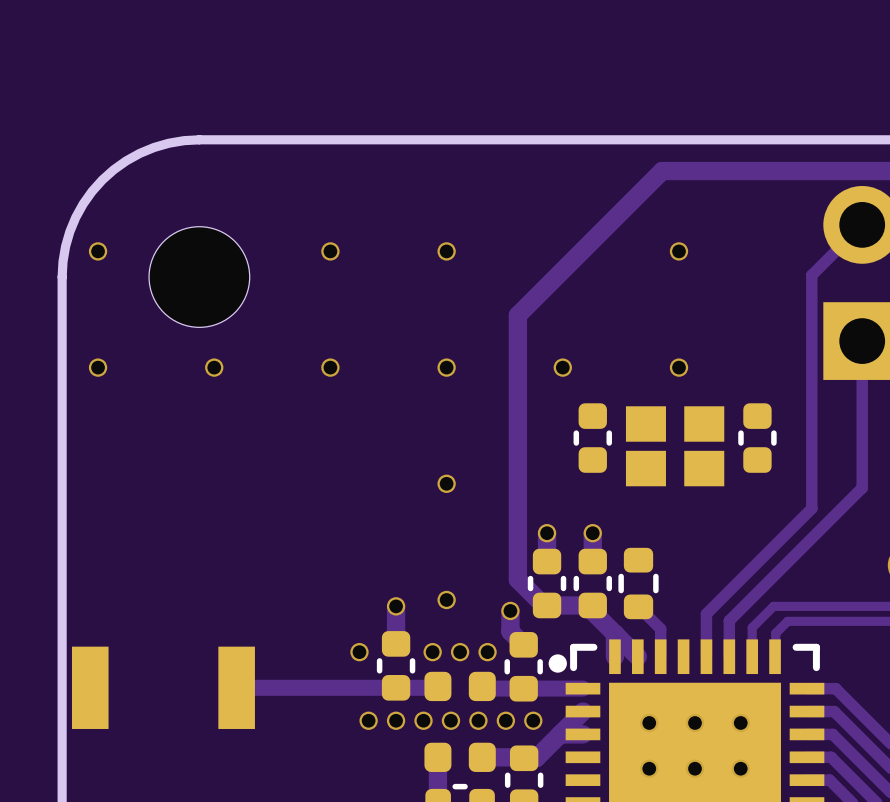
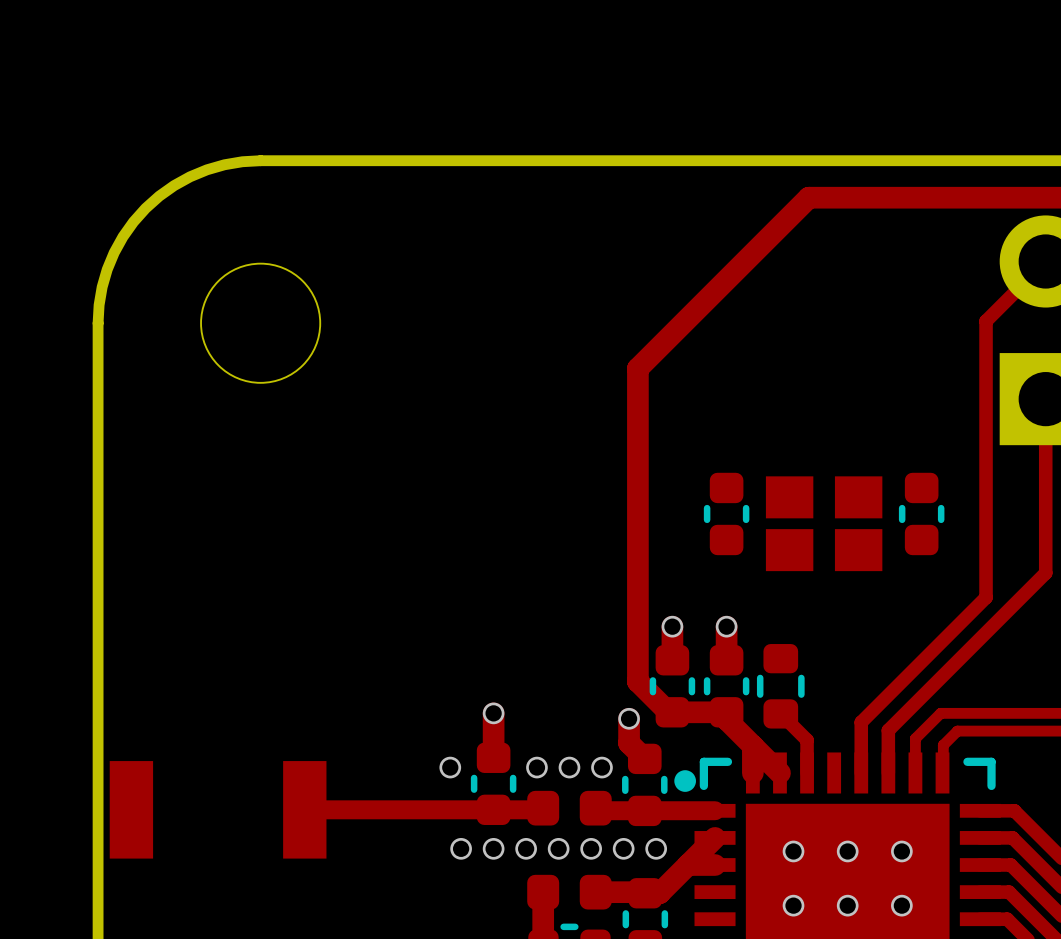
via: (98, 251) -> none
via: (330, 251) -> none
via: (446, 251) -> none
via: (679, 251) -> none
via: (98, 367) -> none
via: (214, 367) -> none
via: (330, 367) -> none
via: (446, 367) -> none
via: (562, 367) -> none
via: (679, 367) -> none
via: (446, 483) -> none
via: (446, 599) -> none

